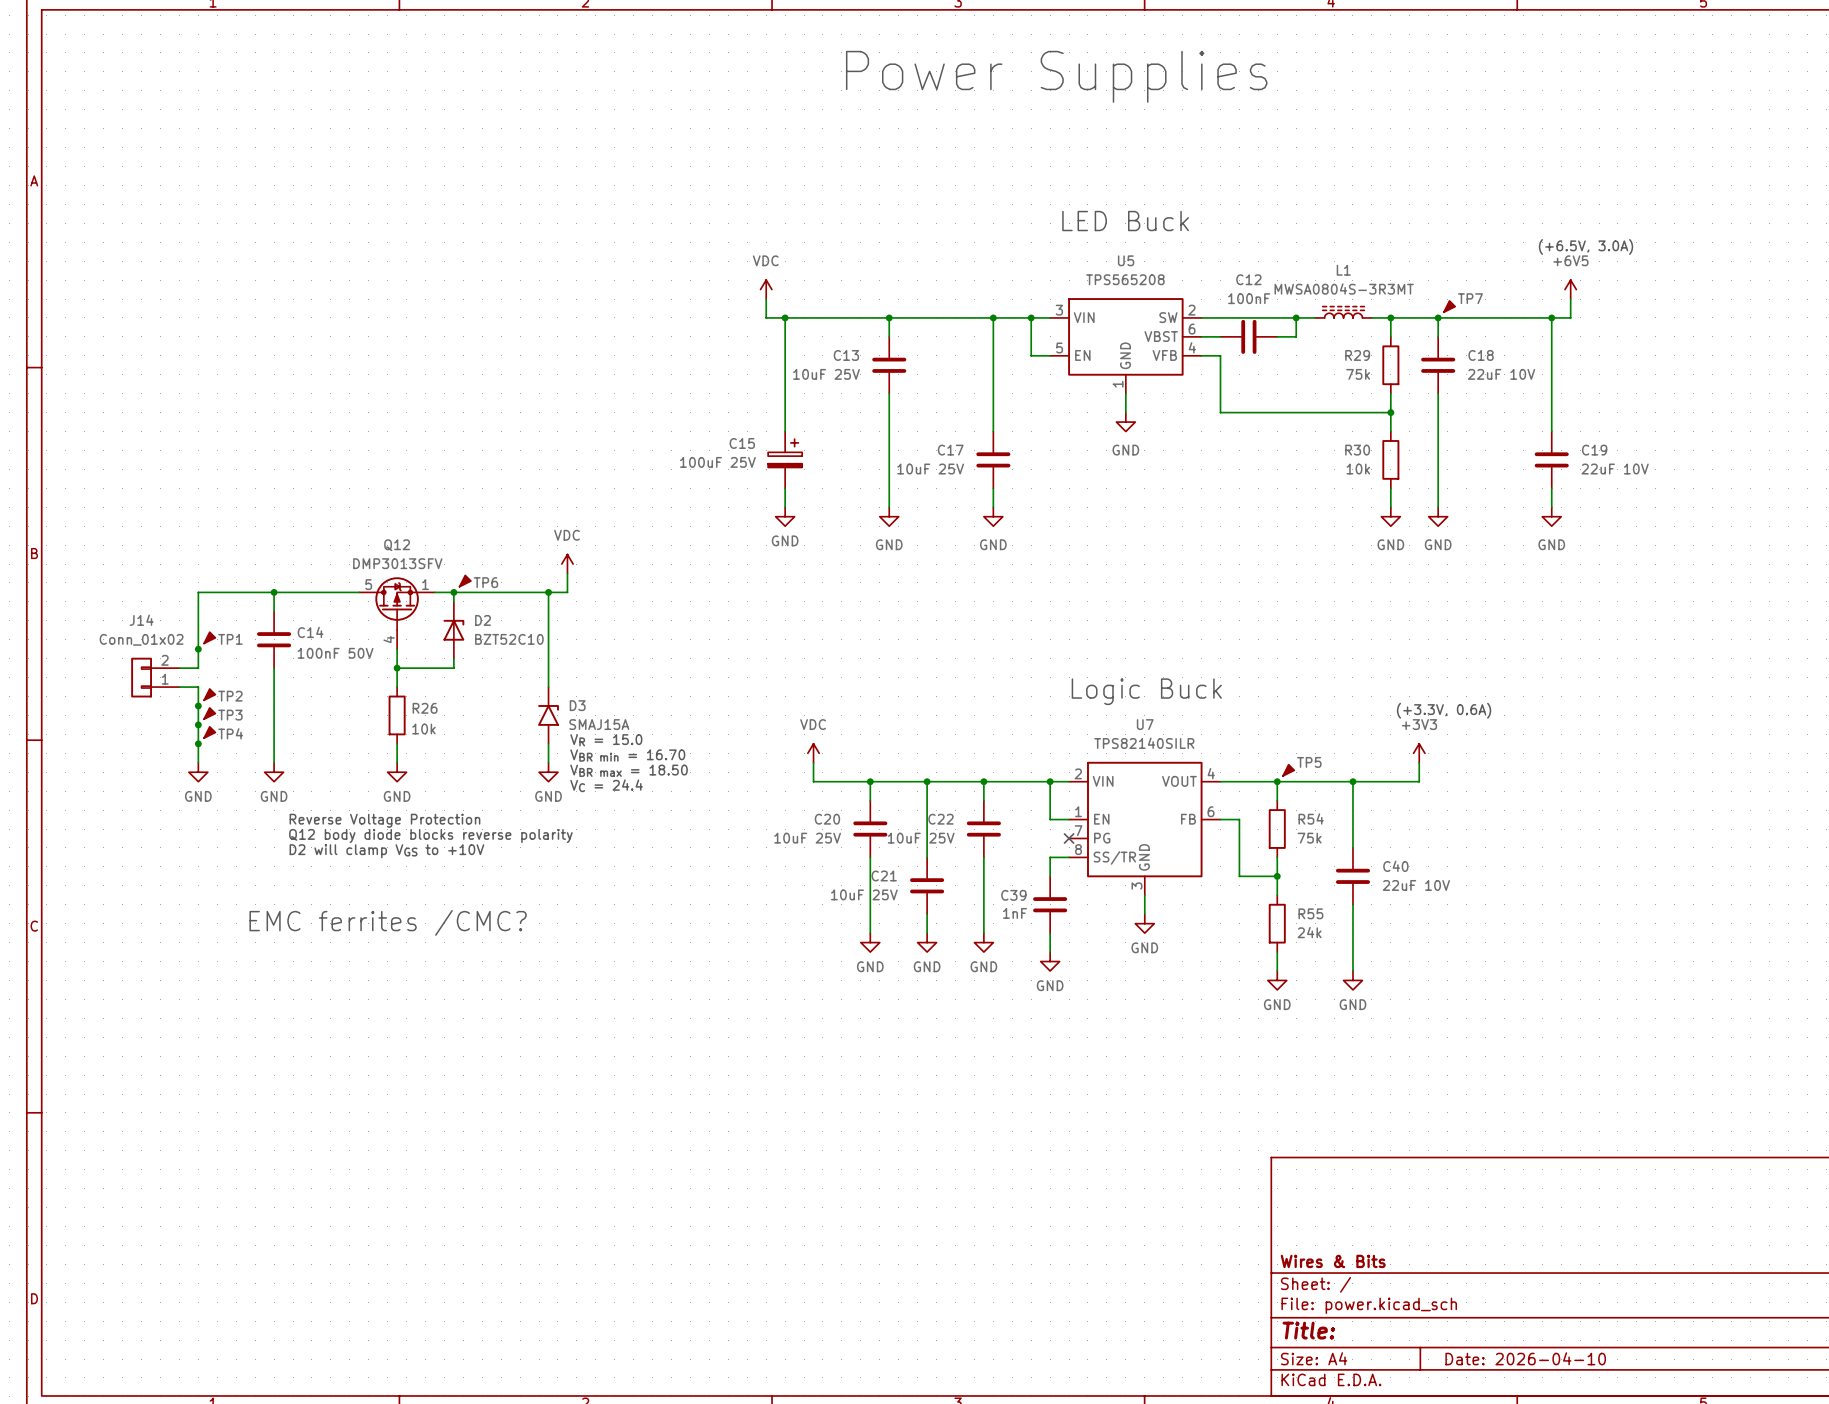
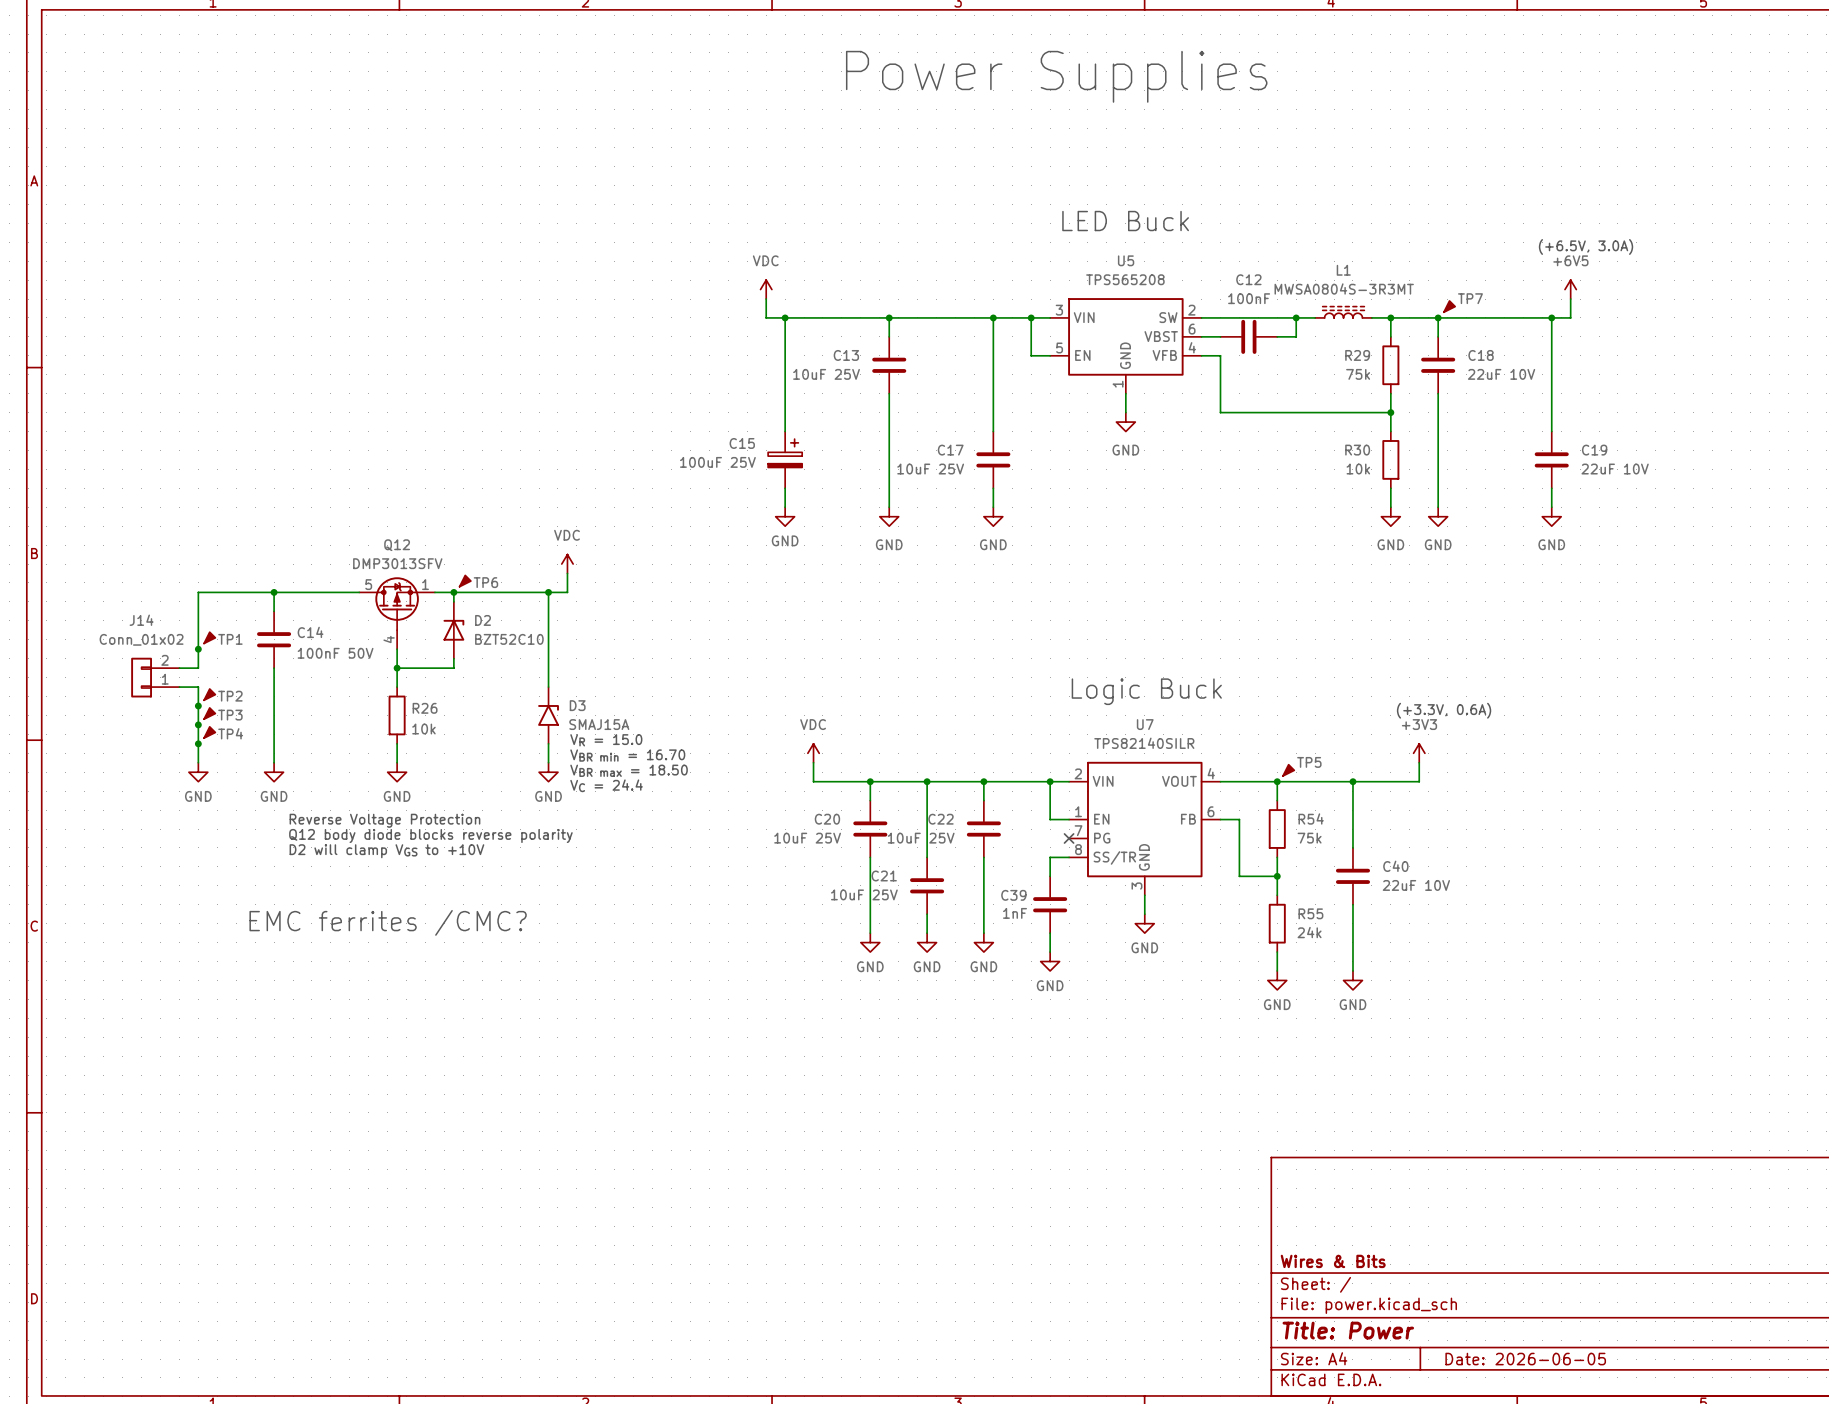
title block: Title: (1308, 1330) -> Title: Power (1348, 1330)
title block: Date: 2026-04-10 (1525, 1358) -> Date: 2026-06-05 (1525, 1359)

